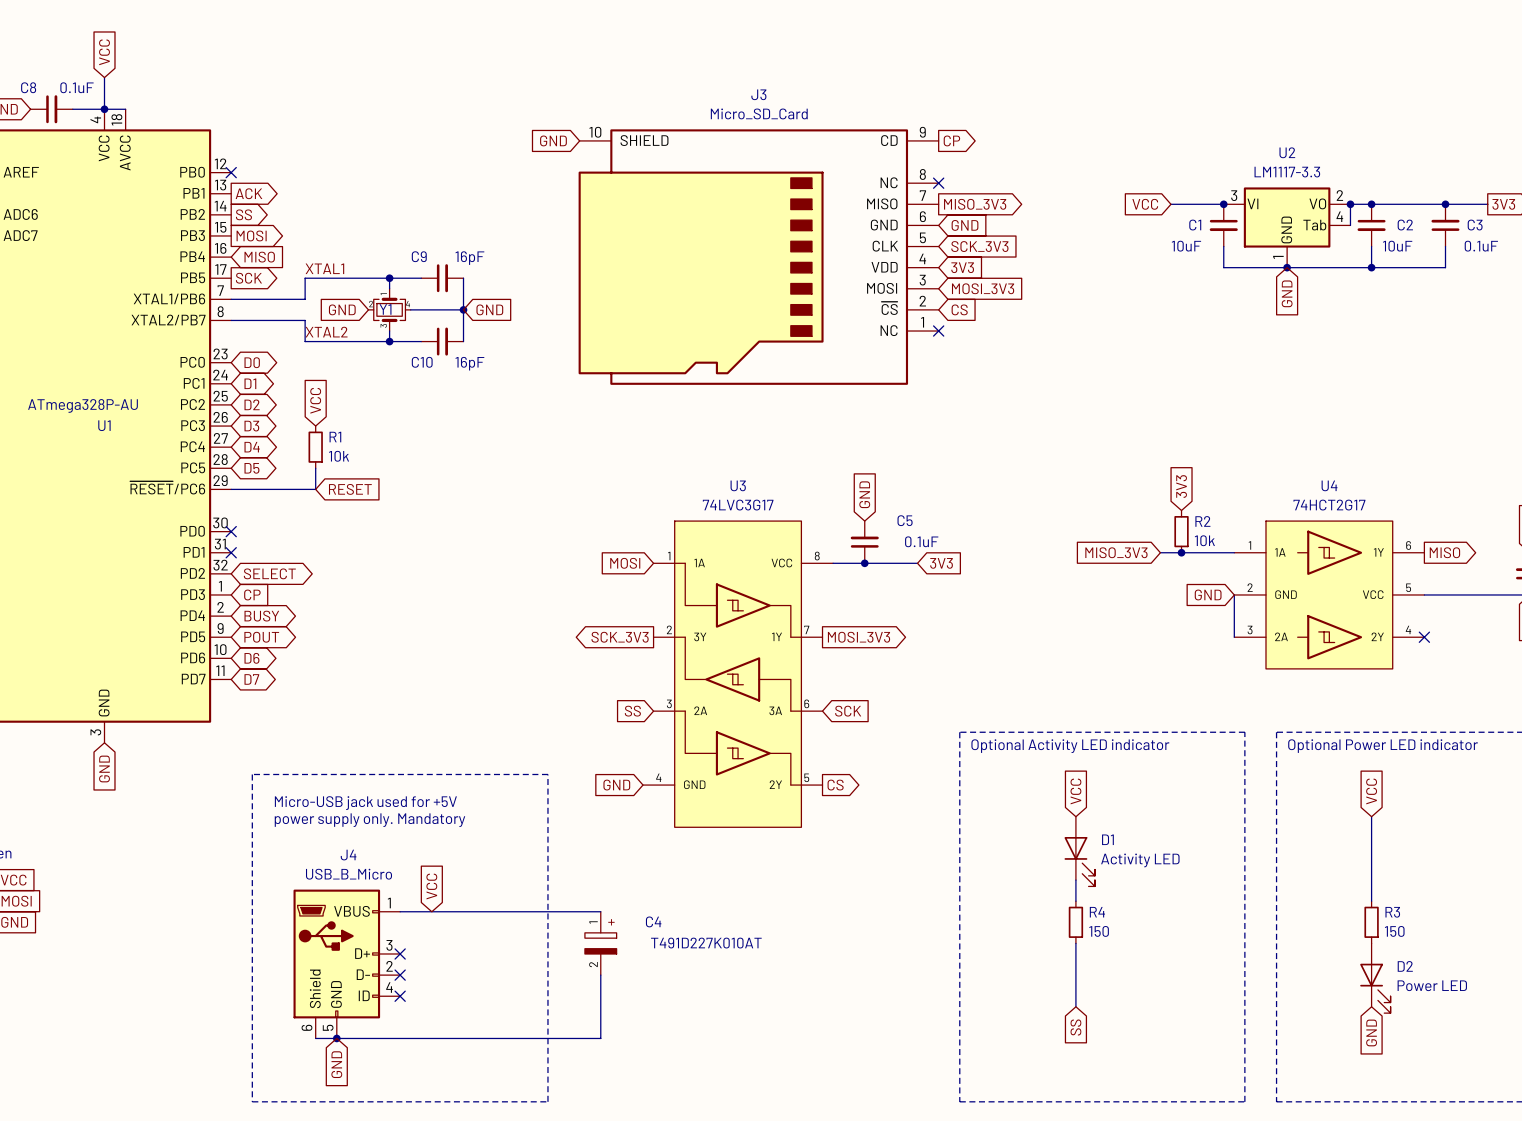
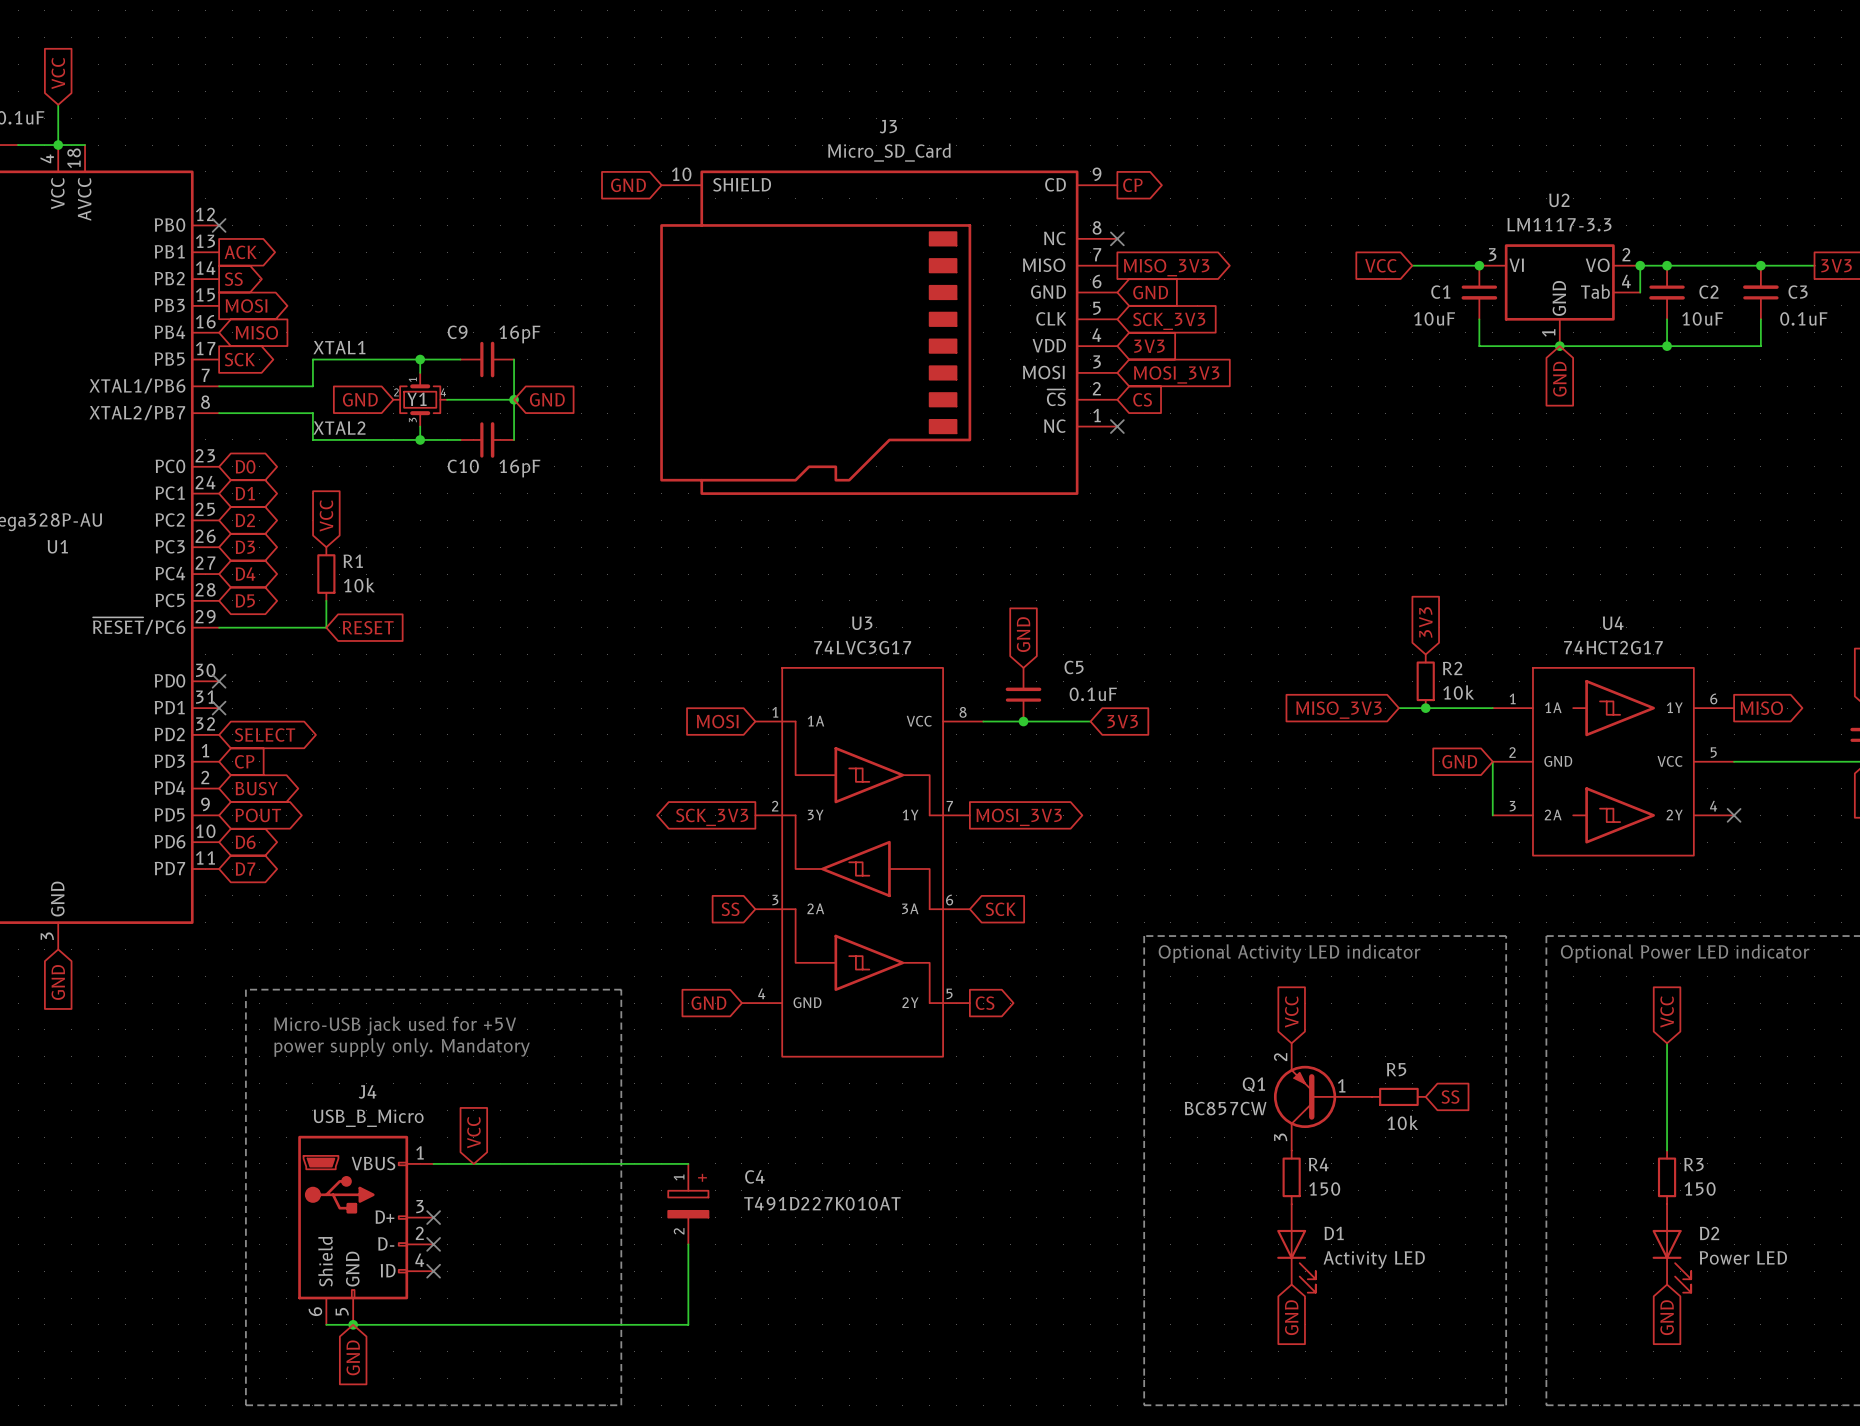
D1 position: (1079, 851) -> (1296, 1248)
Q1: none -> BC857CW (1323, 1096)
R5: none -> 10k (1398, 1096)
global label: none -> SS (1450, 1097)
global label: SS (1075, 1027) -> GND (1291, 1317)

